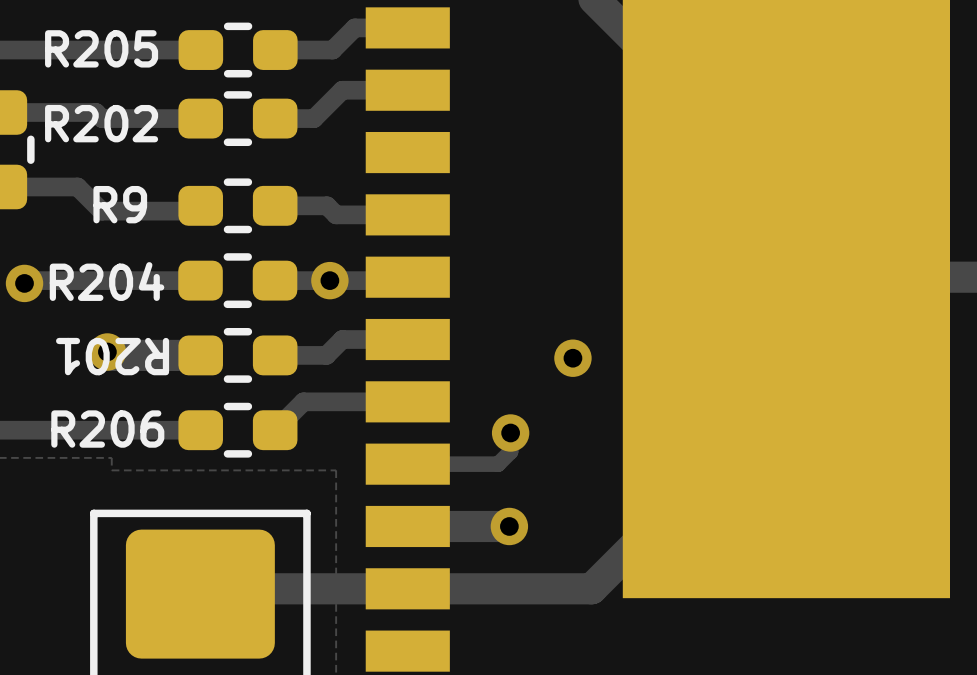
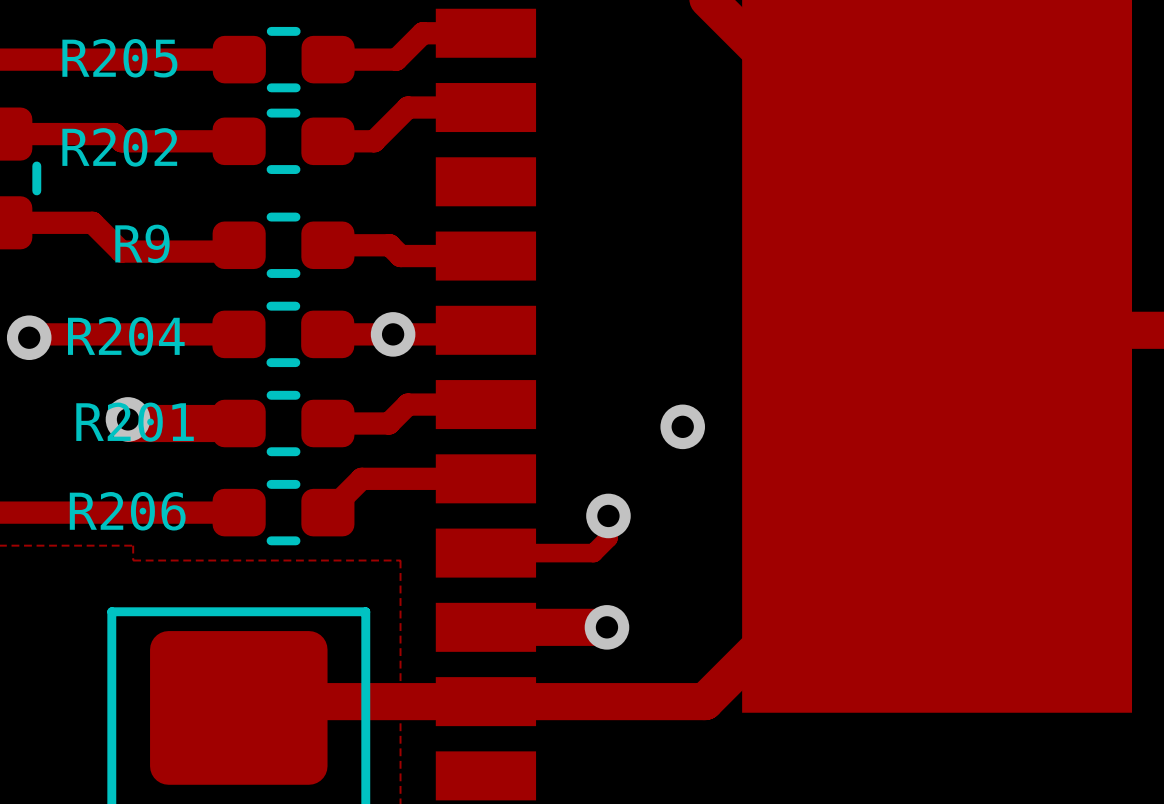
R201 name rotation: 0° (112, 356) -> 180° (135, 422)

